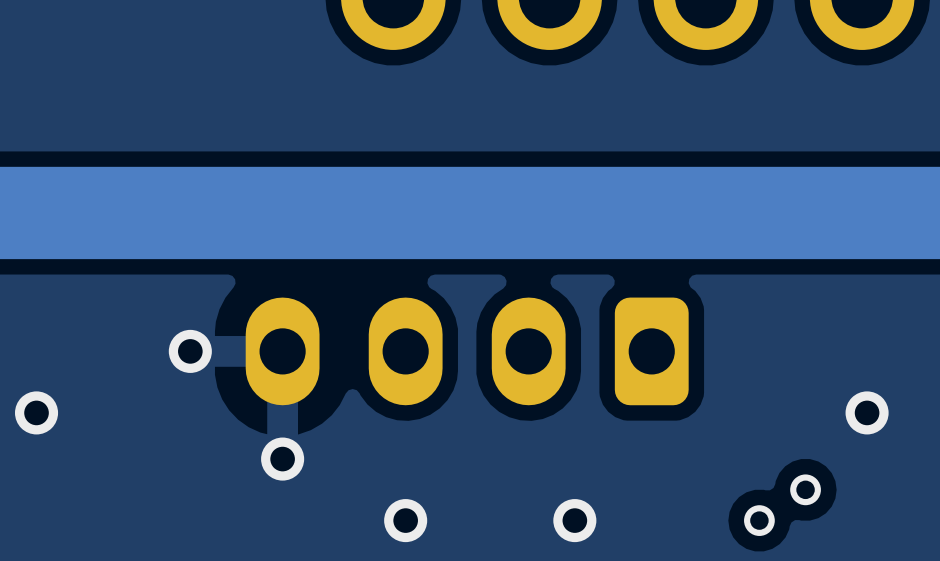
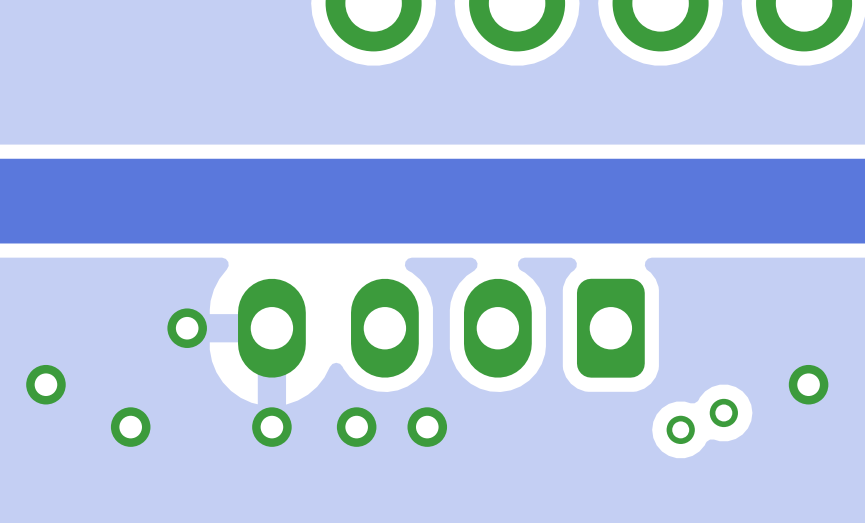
via: none -> (723, 412)
via: none -> (130, 427)
via: none -> (356, 427)
via: none -> (427, 427)
via: none -> (680, 429)
via: (805, 489) -> none
via: (405, 520) -> none
via: (574, 520) -> none
via: (759, 520) -> none

